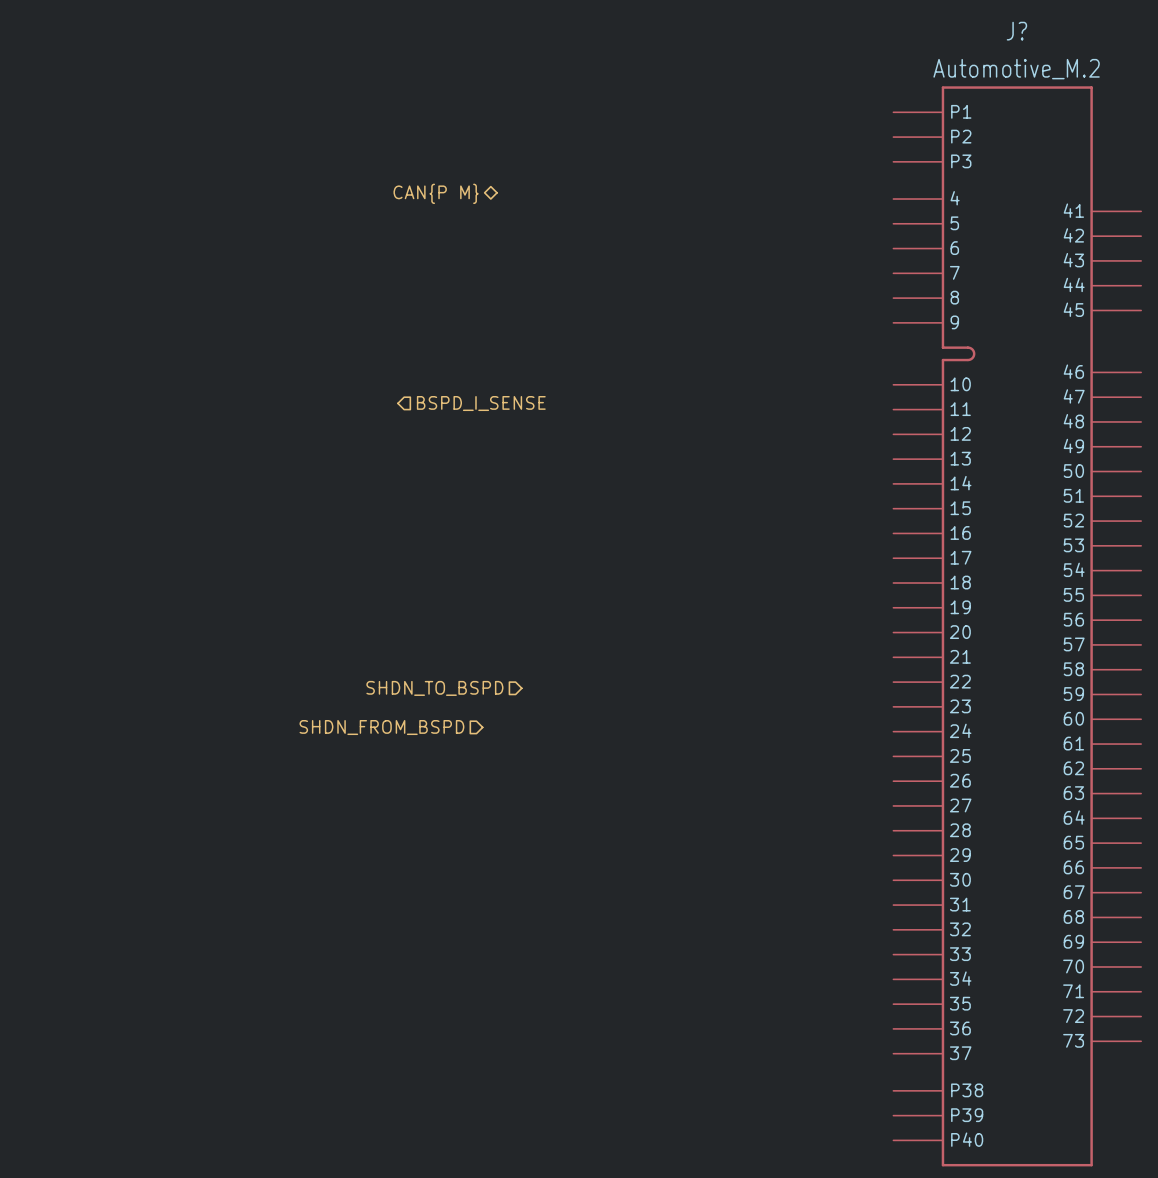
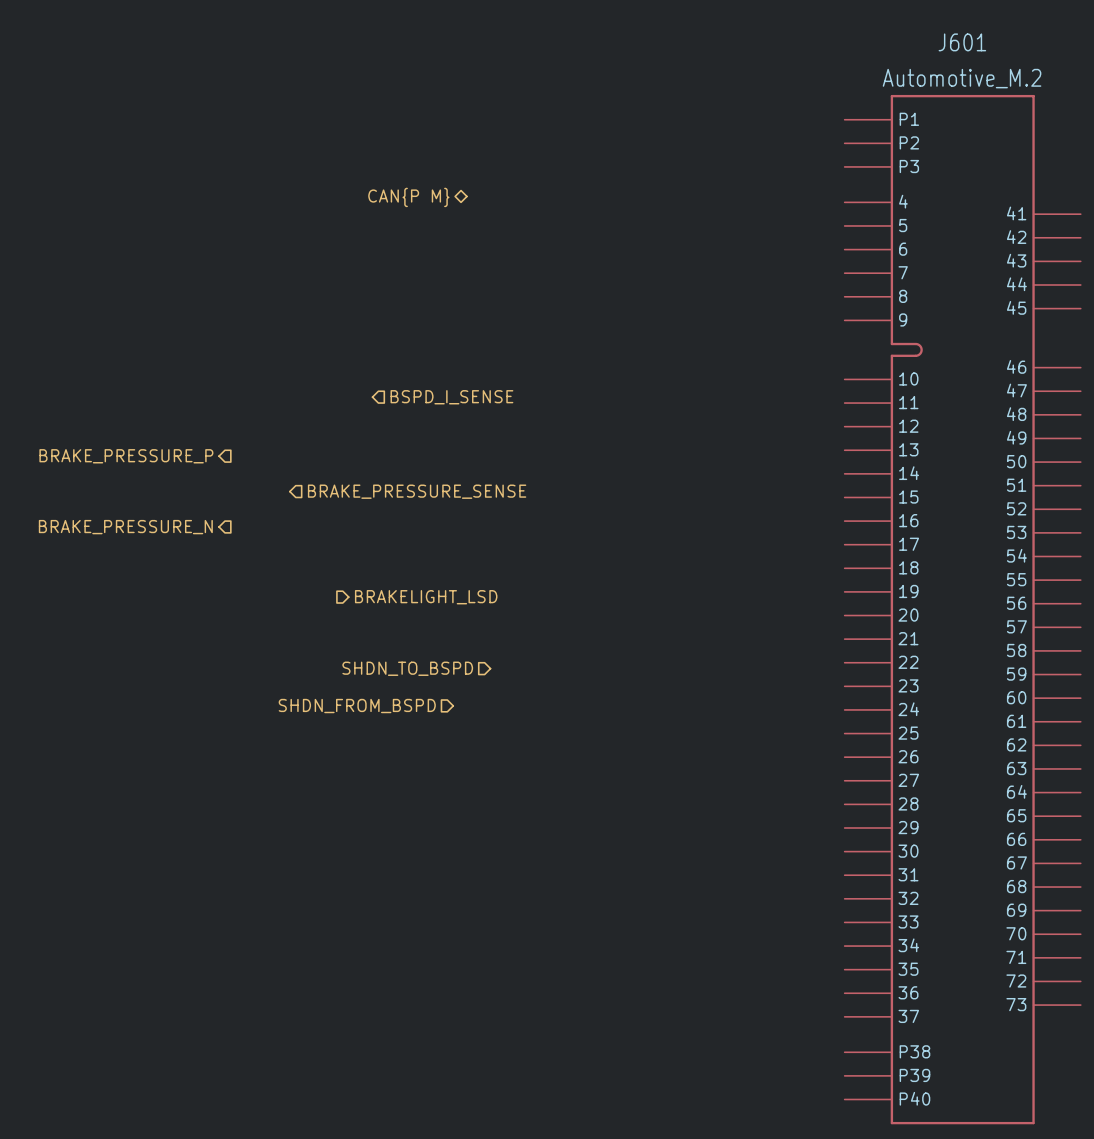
J? name: J? (1016, 31) -> J601 (962, 42)
hierarchical label: none -> BRAKE_PRESSURE_P (126, 456)
hierarchical label: none -> BRAKE_PRESSURE_SENSE (417, 491)
hierarchical label: none -> BRAKE_PRESSURE_N (125, 527)
hierarchical label: none -> BRAKELIGHT_LSD (426, 597)

